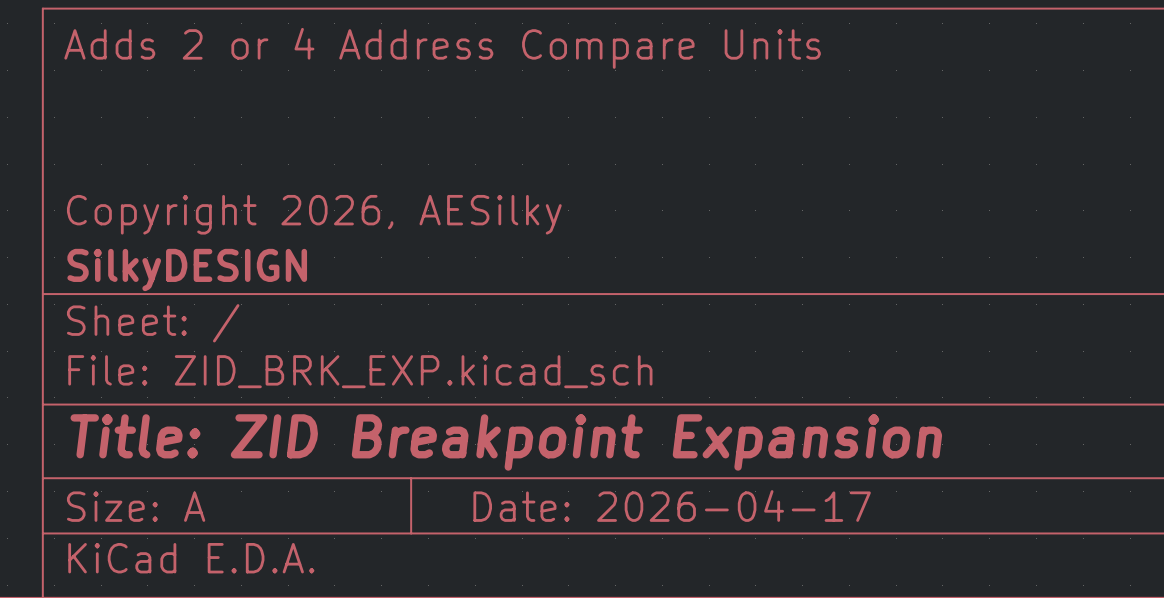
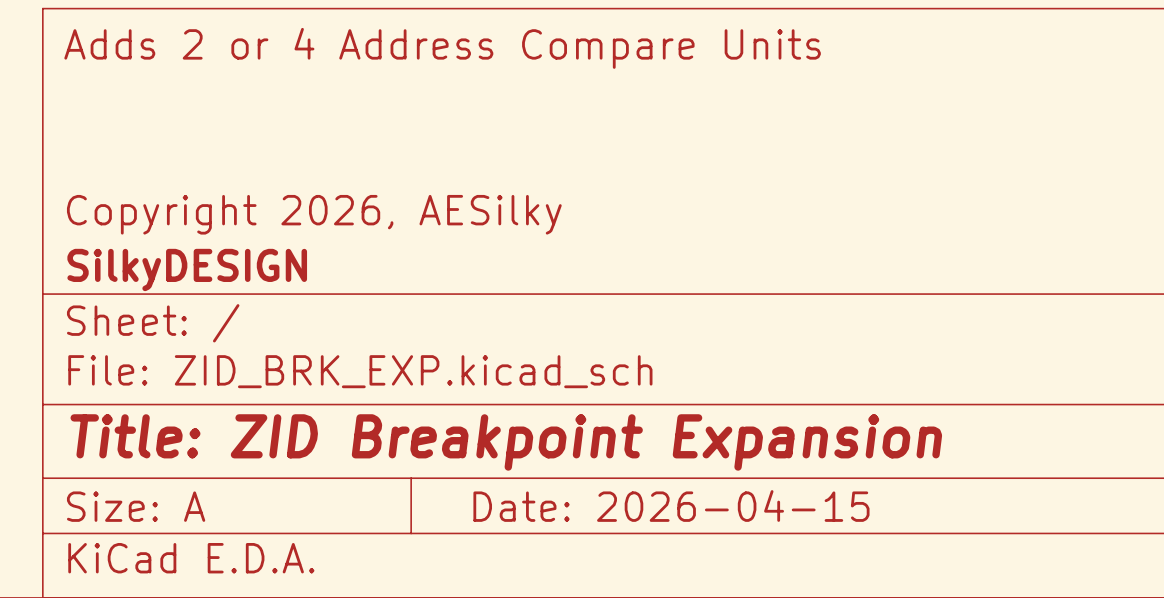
title block: Date: 2026-04-17 (672, 505) -> Date: 2026-04-15 (671, 505)

